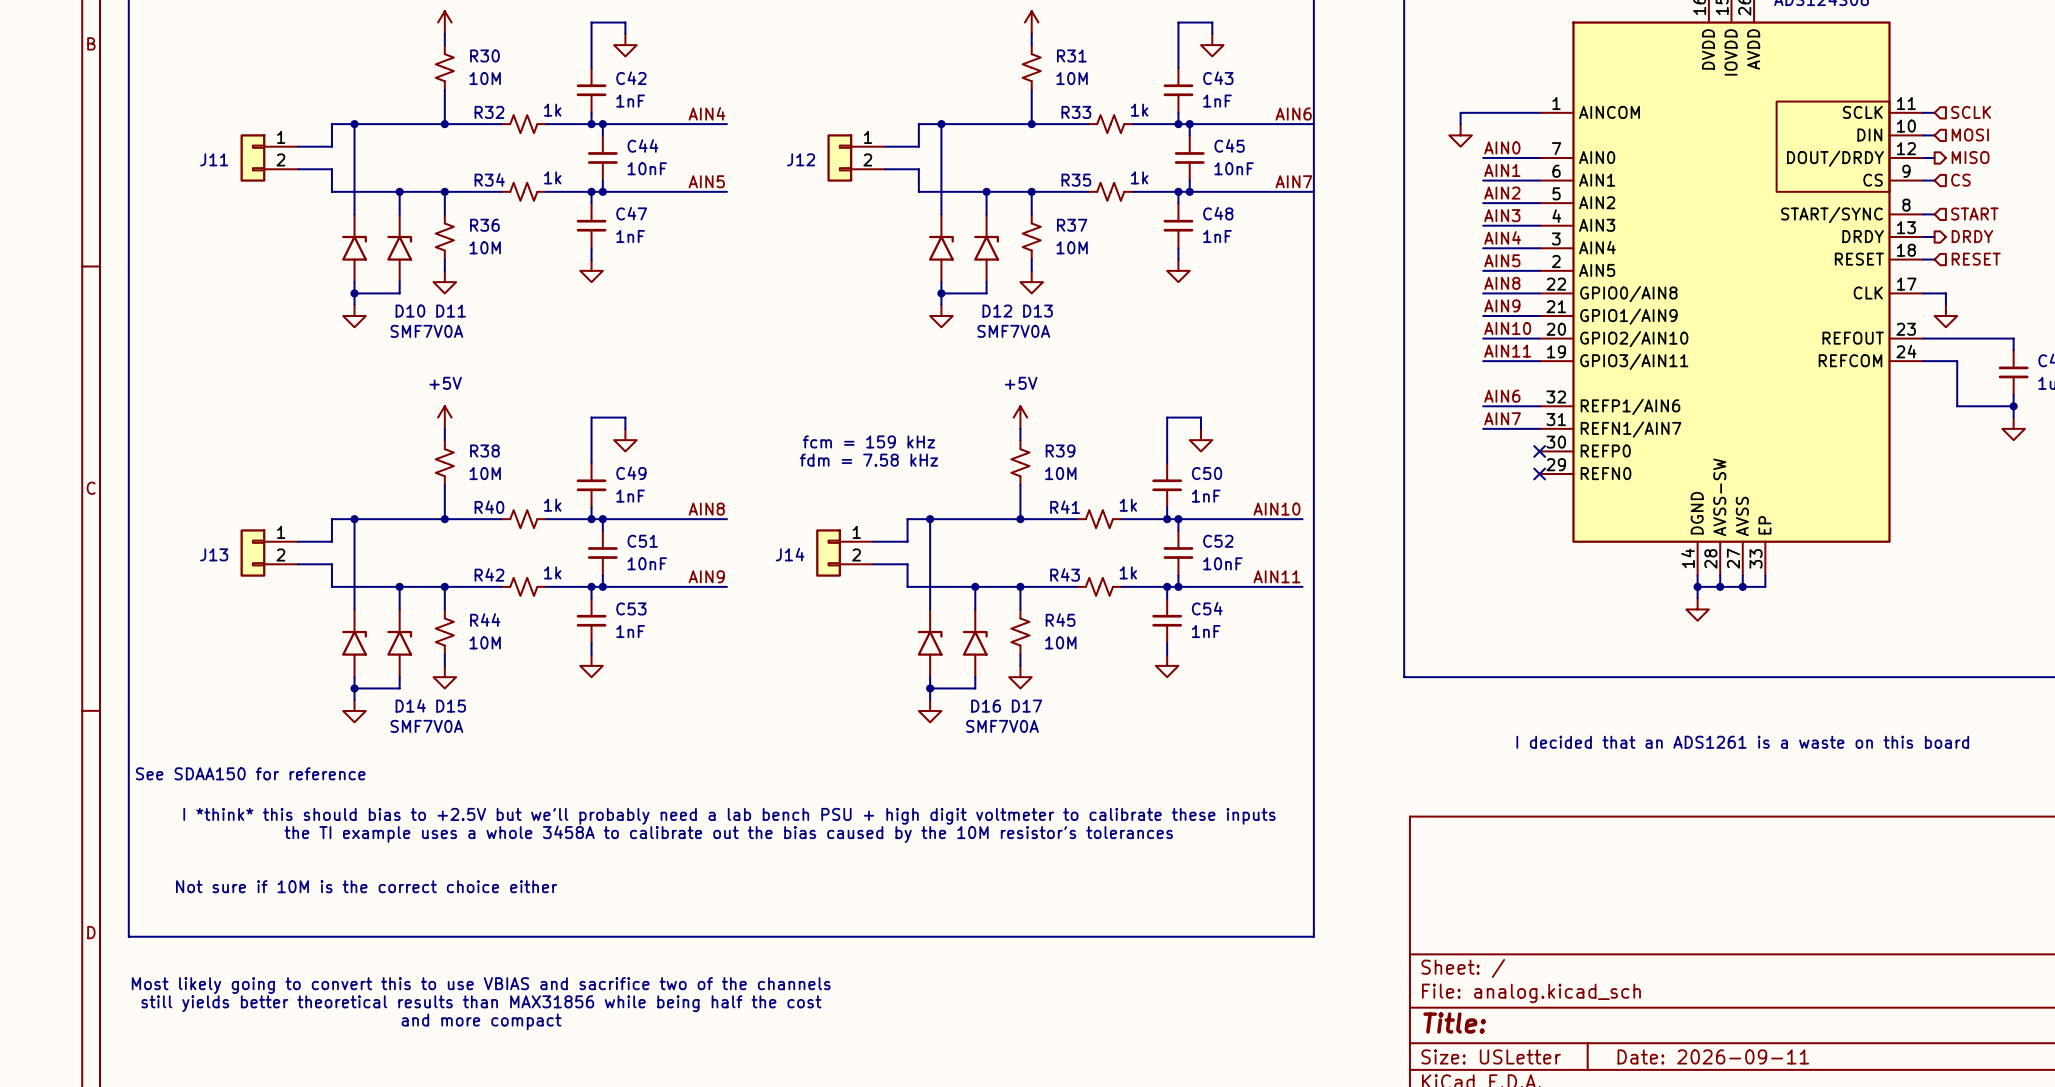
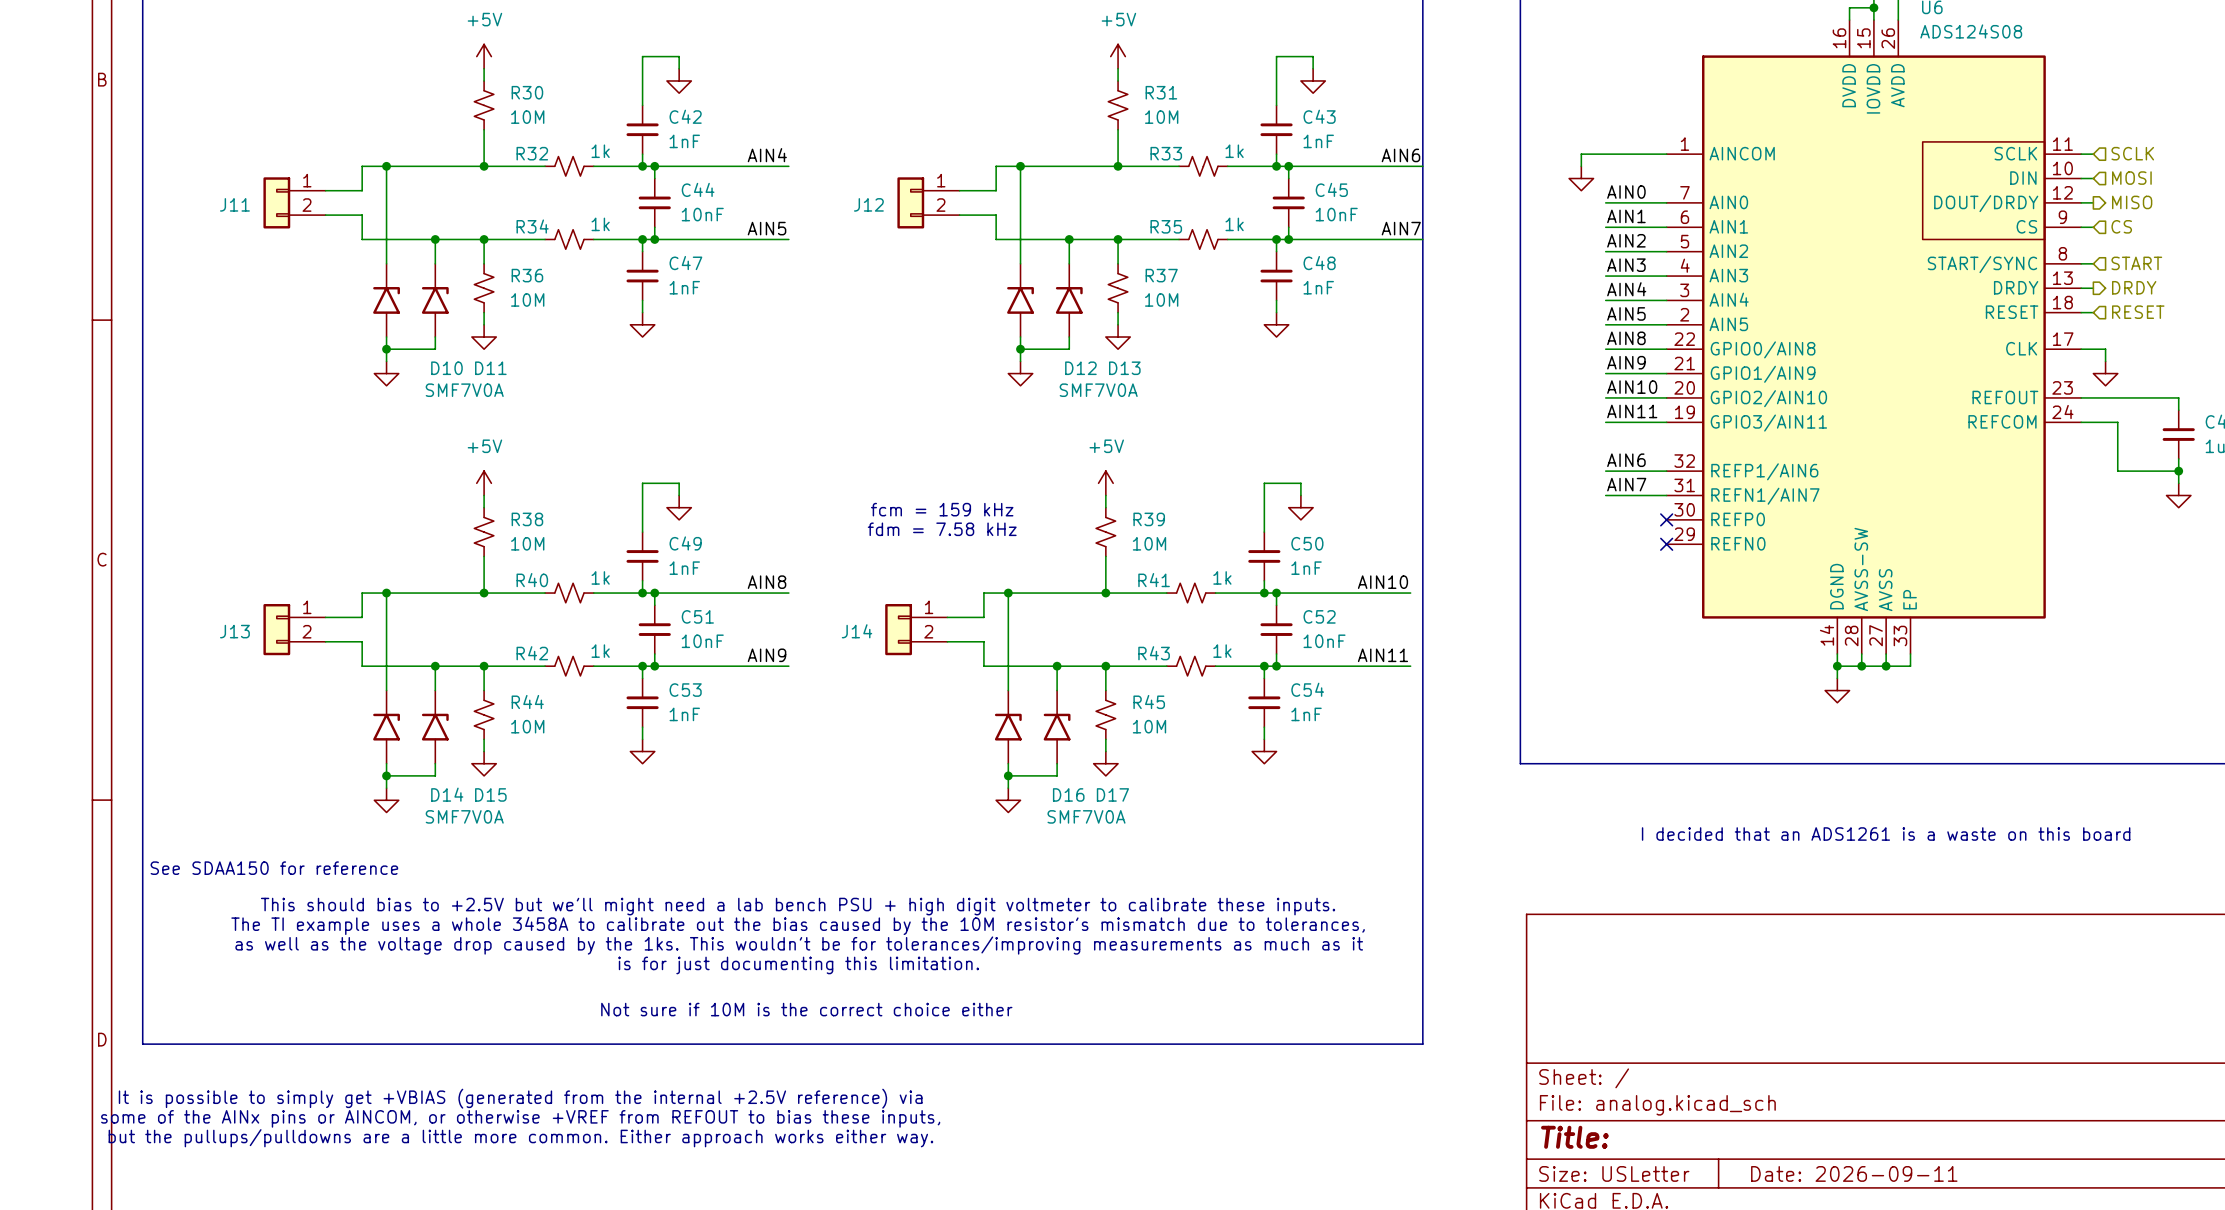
text: I *think* this should bias to +2.5V but we'll probably need a lab bench PSU + high digit voltmeter to calibrate these inputs (729, 816) -> This should bias to +2.5V but we'll might need a lab bench PSU + high digit voltmeter to calibrate these inputs. (798, 906)
text: the TI example uses a whole 3458A to calibrate out the bias caused by the 10M resistor's tolerances (728, 834) -> The TI example uses a whole 3458A to calibrate out the bias caused by the 10M resistor's mismatch due to tolerances, (798, 925)
text: none -> as well as the voltage drop caused by the 1ks. This wouldn't be for tolerances/improving measurements as much as it (799, 945)
text: none -> is for just documenting this limitation. (798, 965)
text: Not sure if 10M is the correct choice either (366, 886) -> none
text: none -> Not sure if 10M is the correct choice either (806, 1009)
text: Most likely going to convert this to use VBIAS and sacrifice two of the channels (481, 985) -> It is possible to simply get +VBIAS (generated from the internal +2.5V reference) via (520, 1098)
text: still yields better theoretical results than MAX31856 while being half the cost (481, 1003) -> some of the AINx pins or AINCOM, or otherwise +VREF from REFOUT to bias these inputs, (520, 1118)
text: and more compact (481, 1021) -> but the pullups/pulldowns are a little more common. Either approach works either way. (520, 1138)

